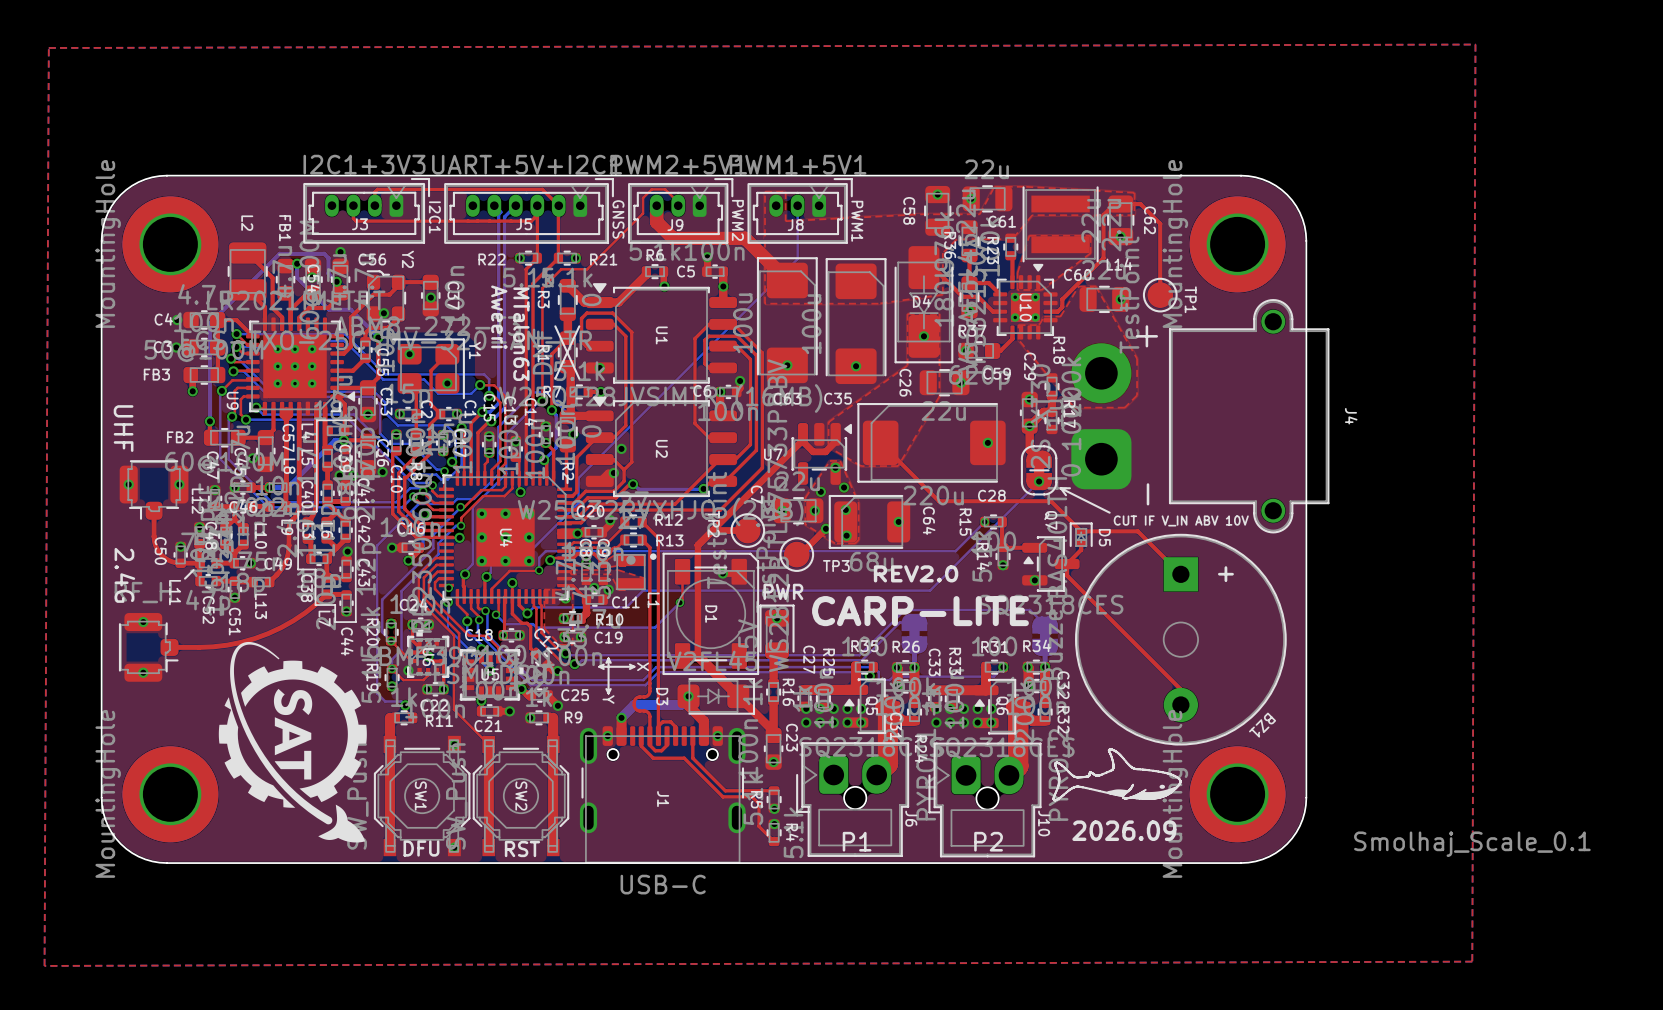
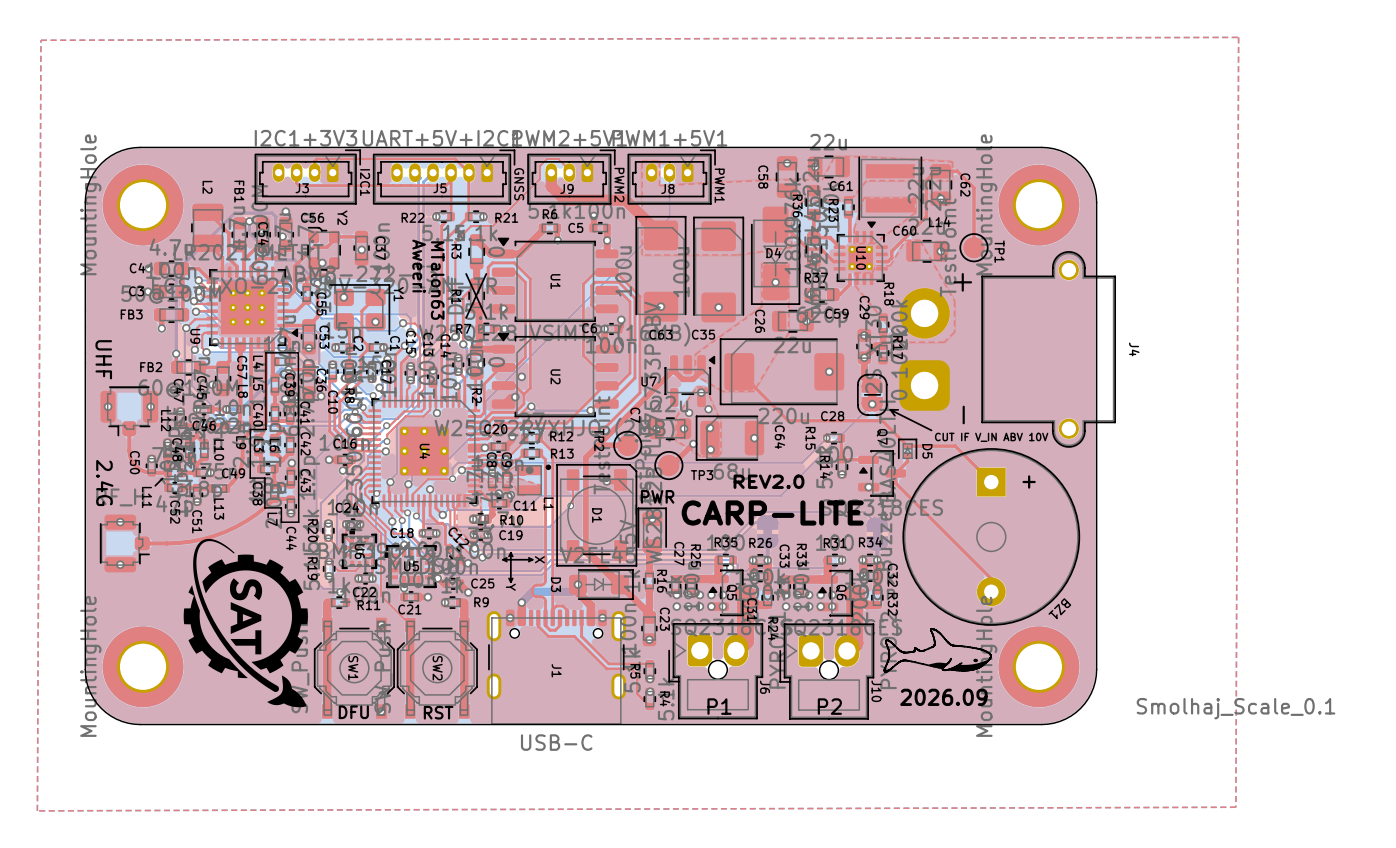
U5 footprint: [459, 649, 524, 701] -> [384, 544, 437, 589]

